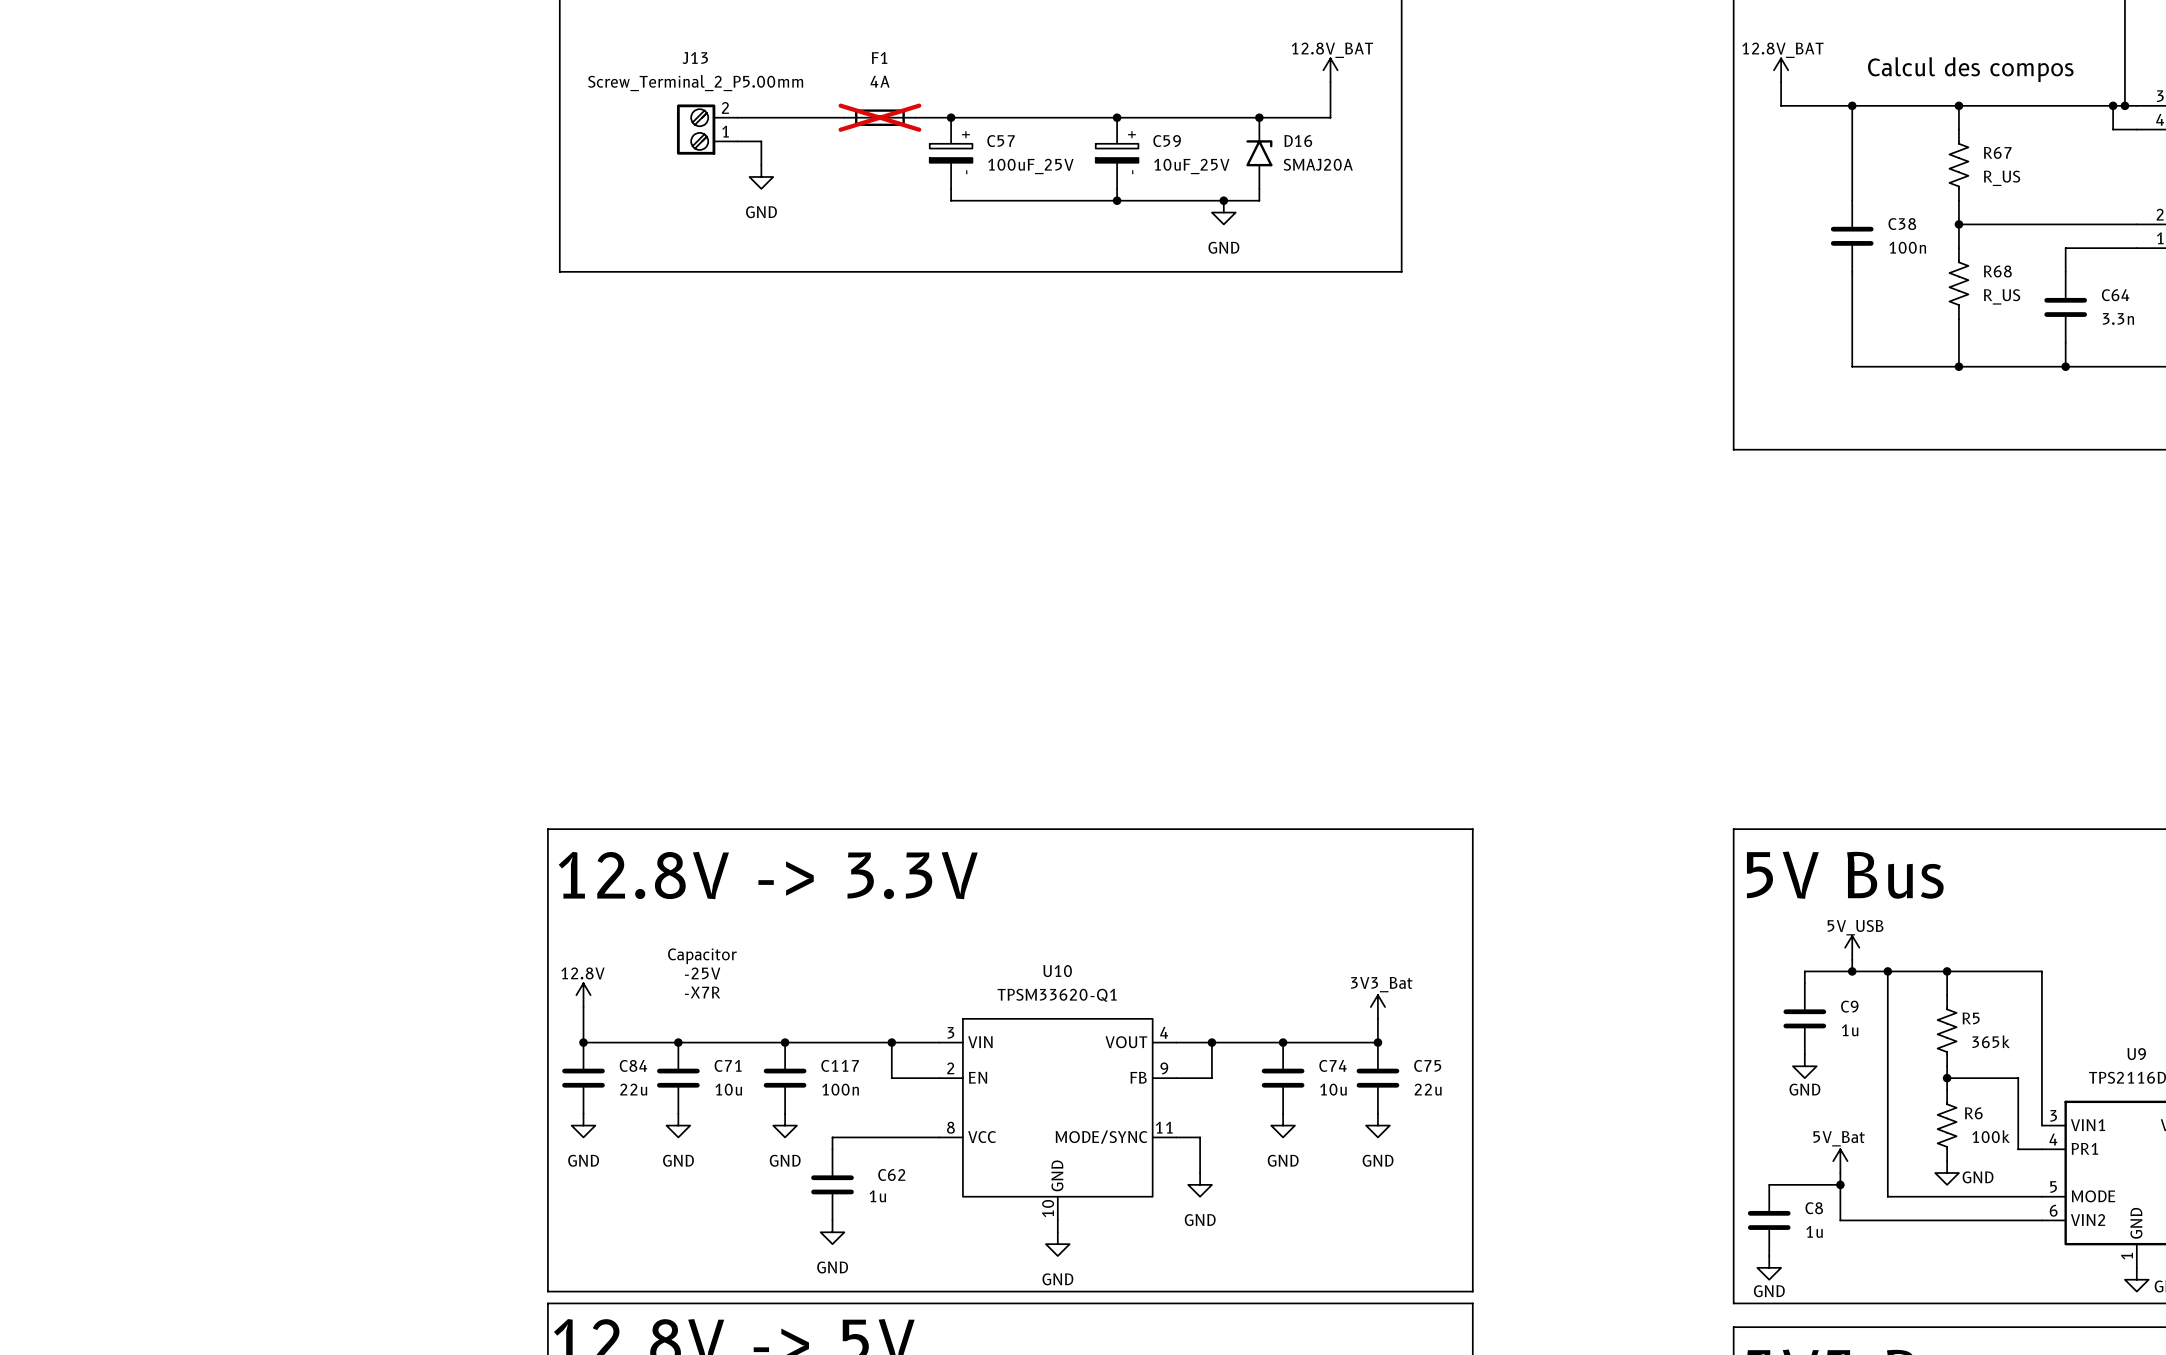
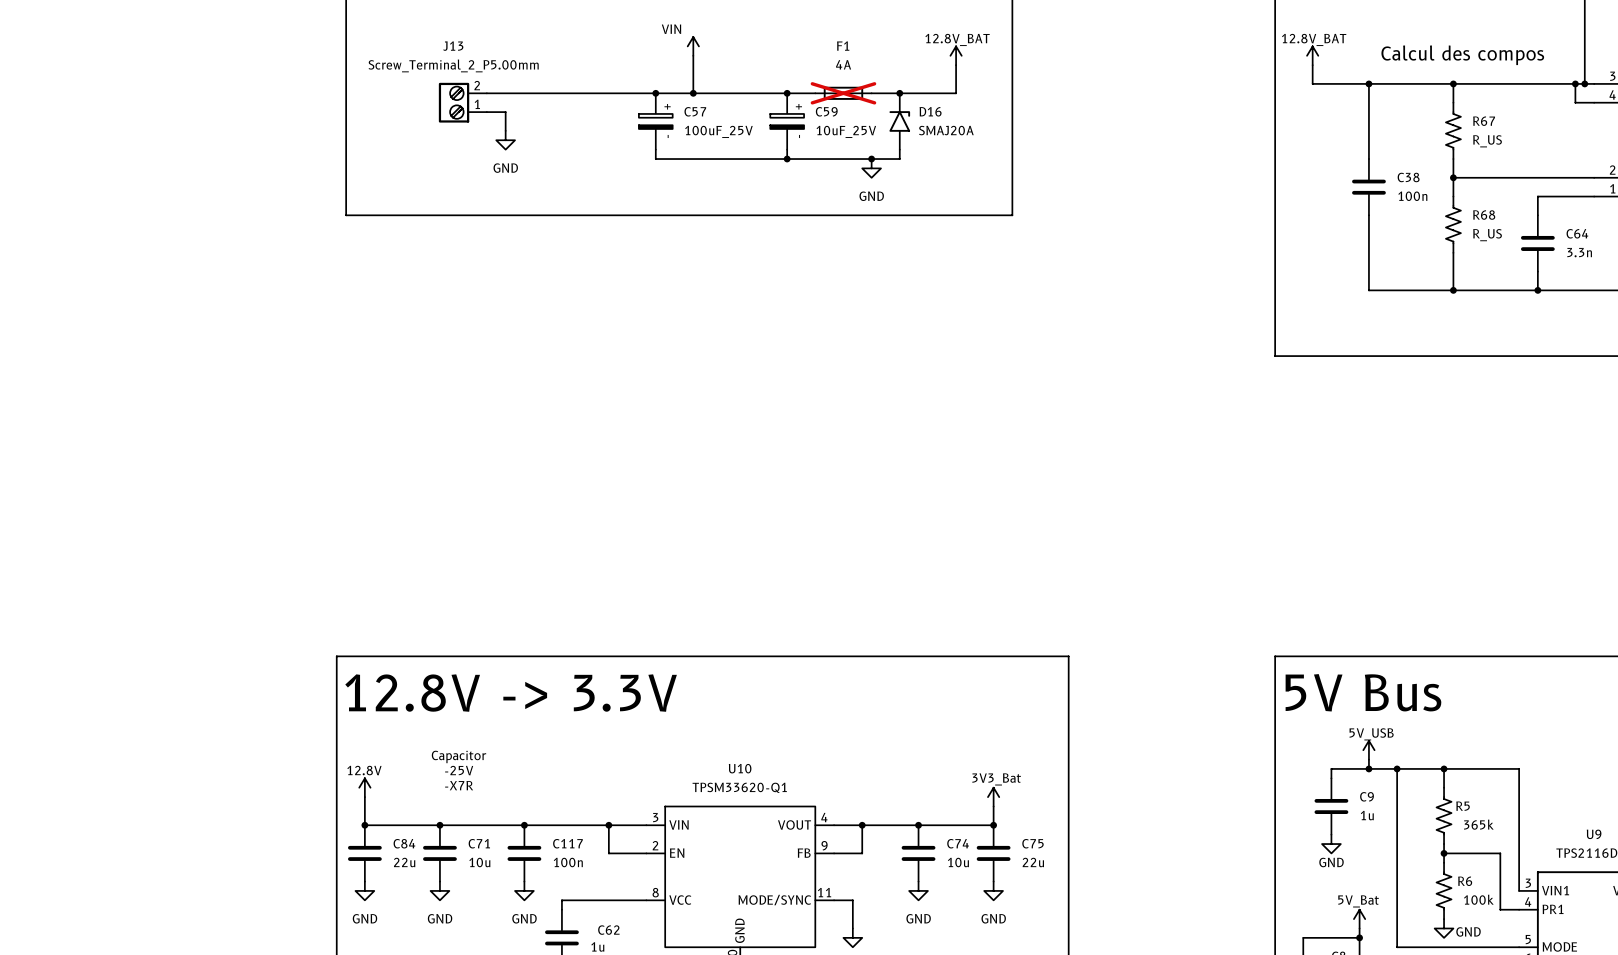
power symbol: none -> VIN (693, 46)
wire: none -> (693, 55) (693, 93)
F1 position: (879, 117) -> (843, 93)
junction: none -> (693, 93)

